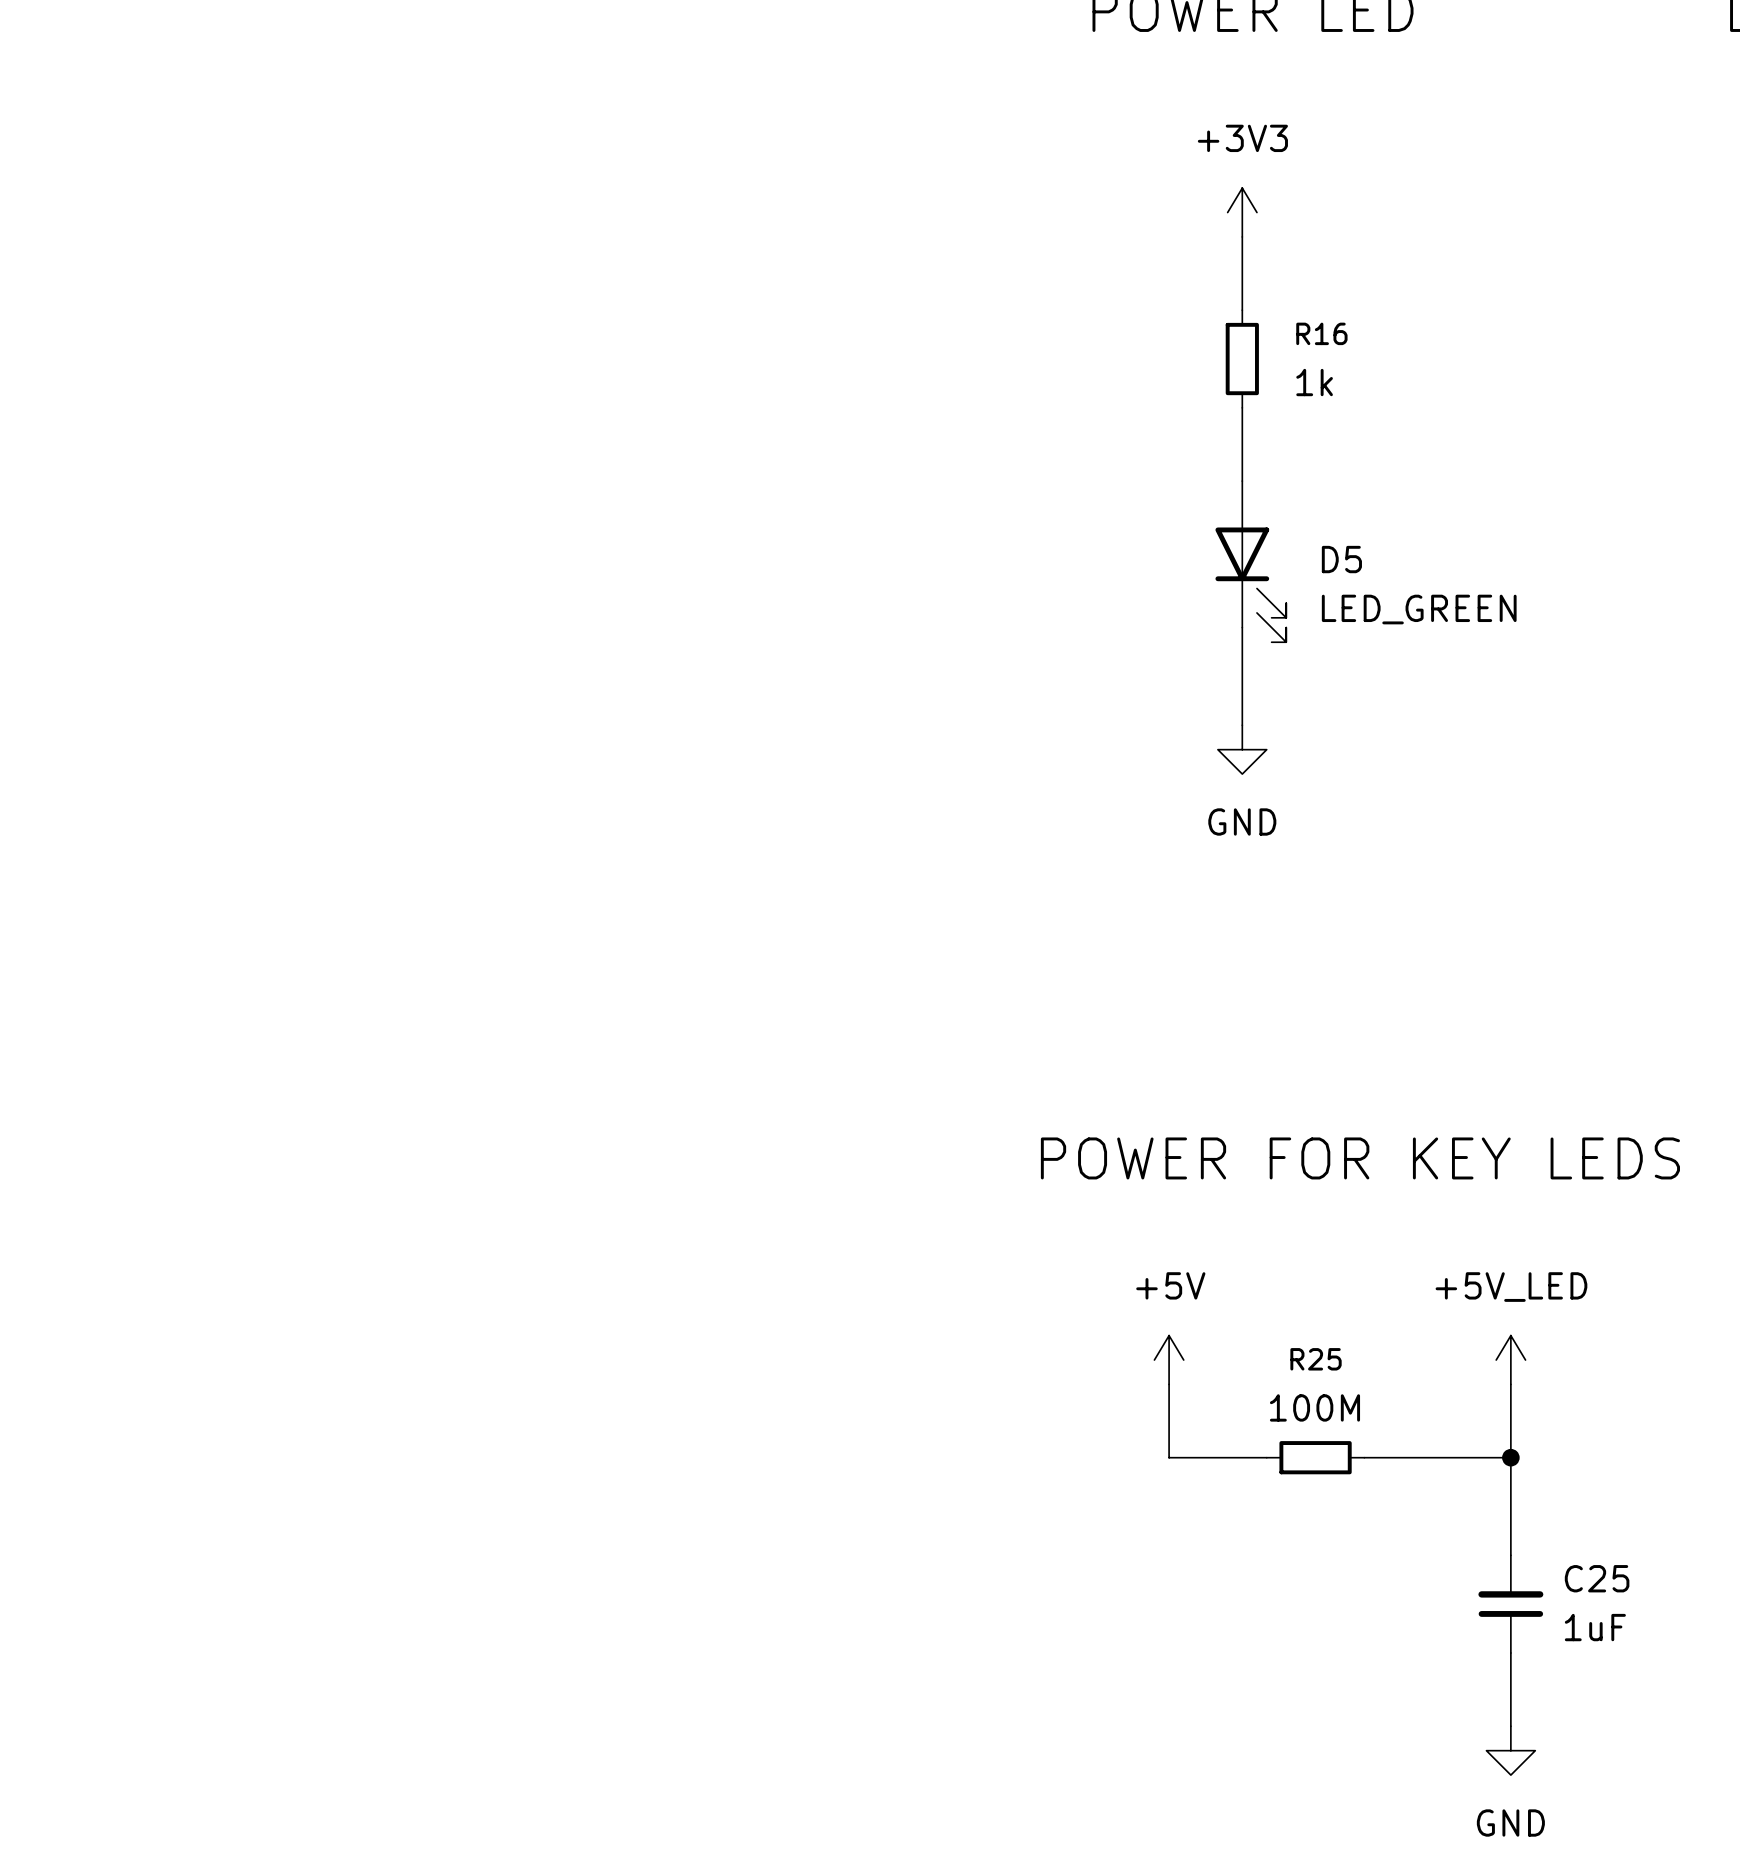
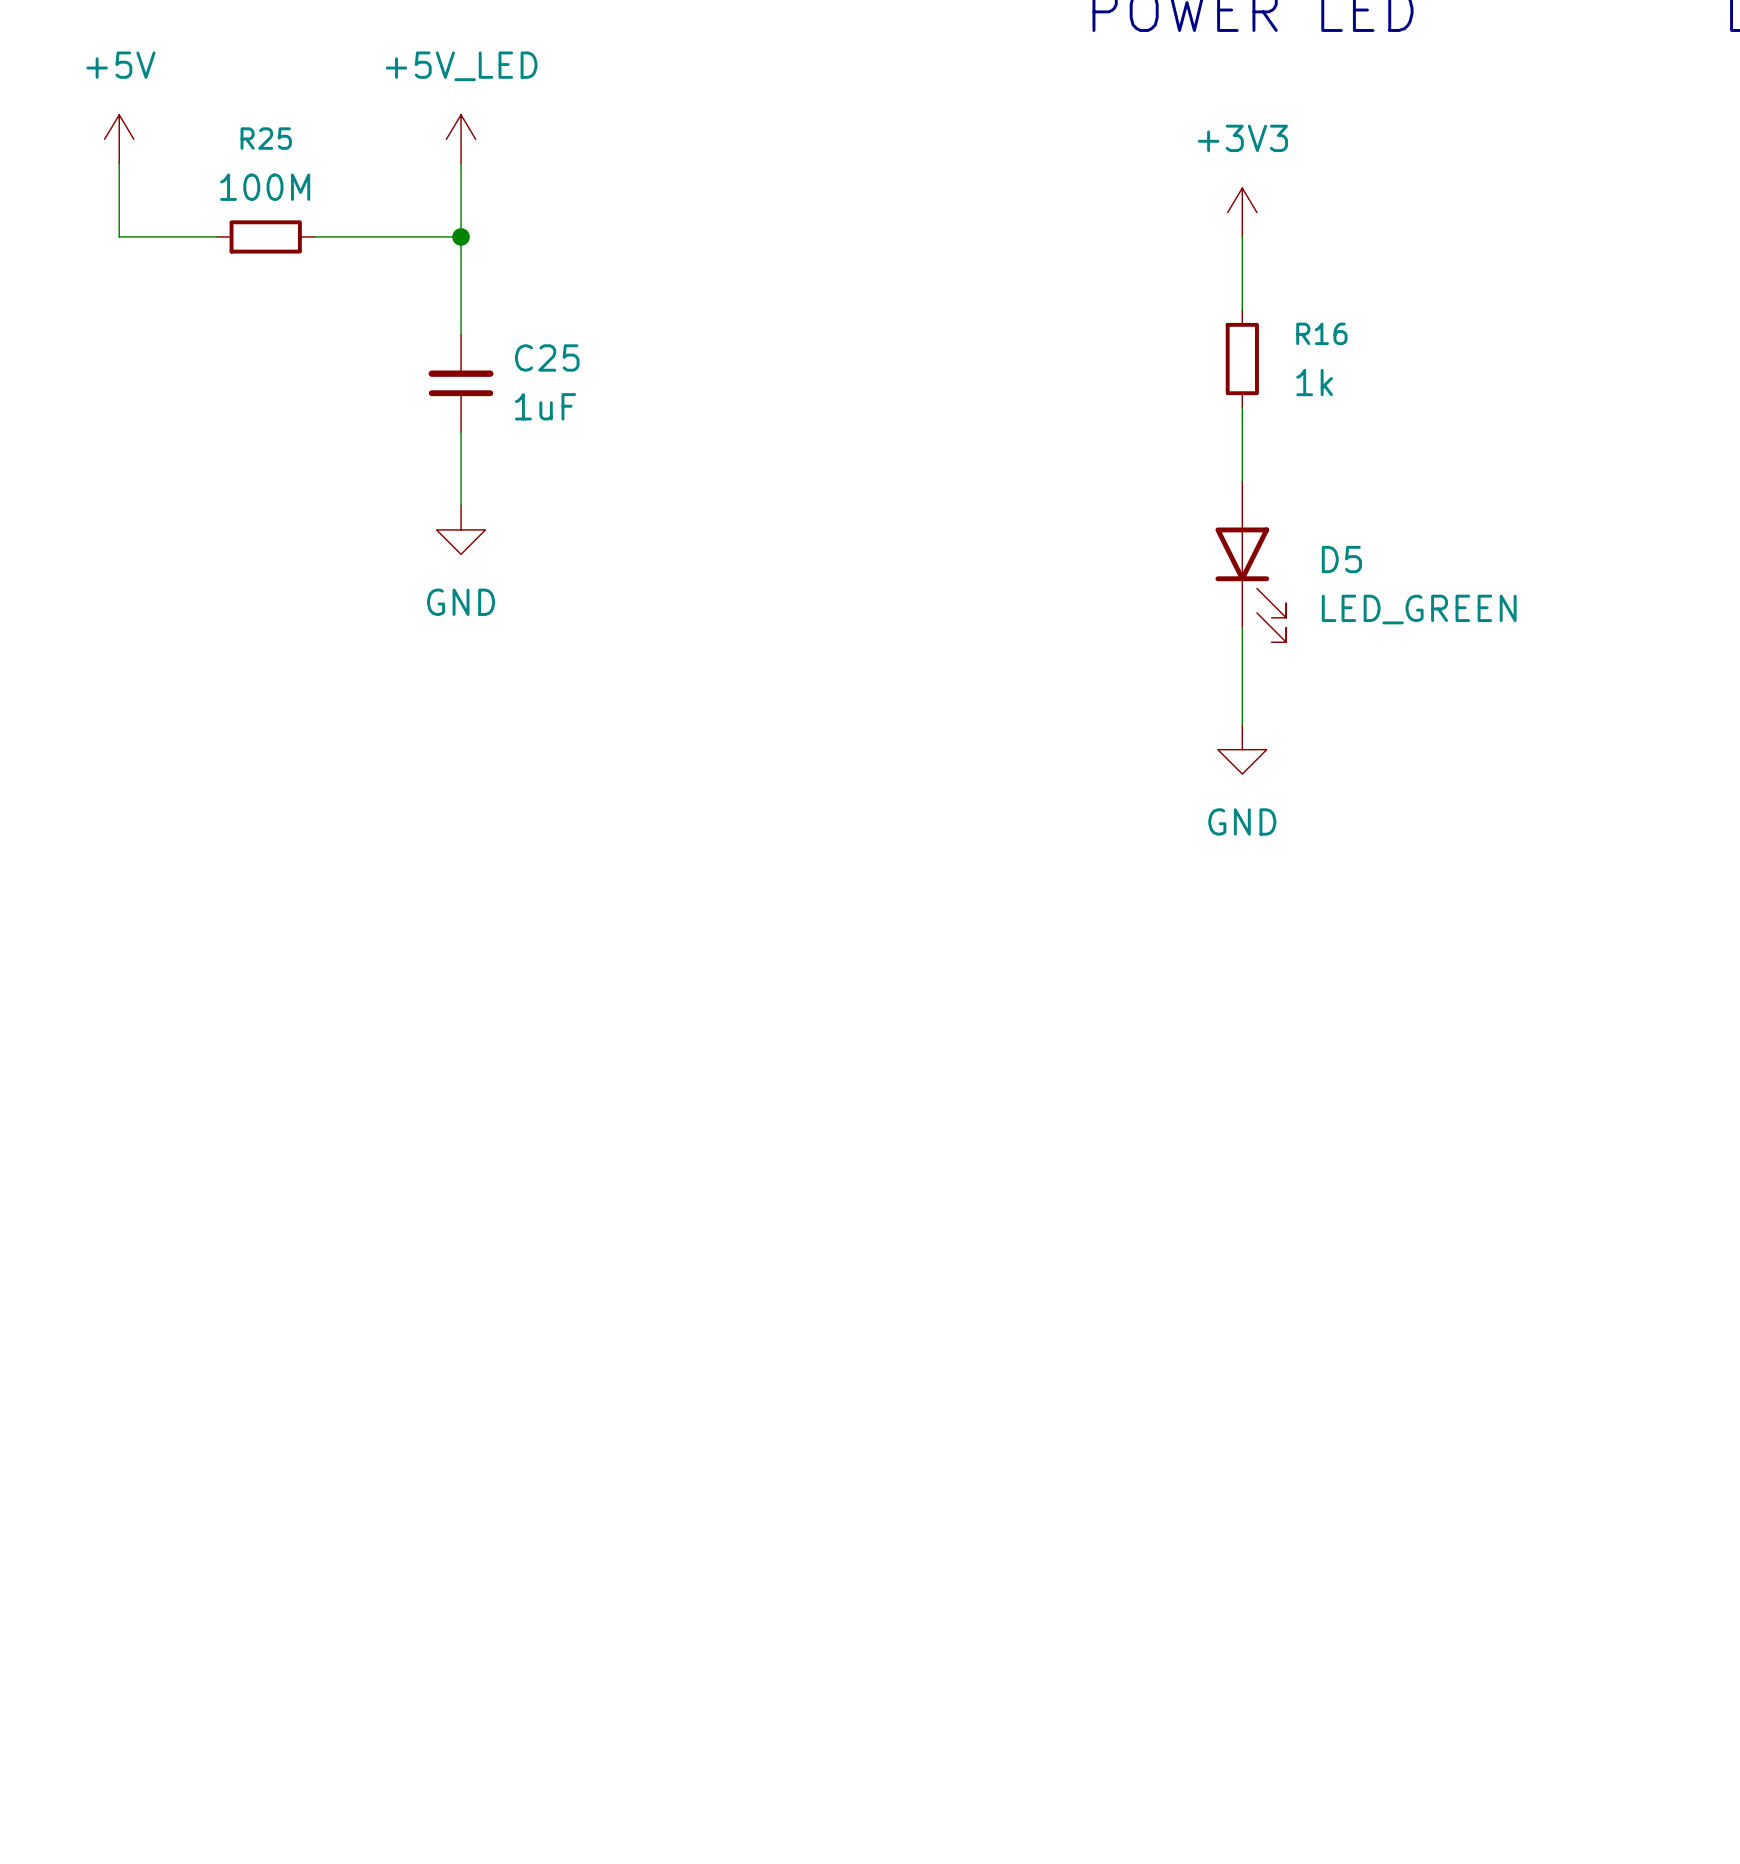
power symbol: none -> +5V (119, 139)
power symbol: none -> +5V_LED (461, 139)
wire: none -> (119, 163) (119, 236) (216, 236)
wire: none -> (461, 163) (461, 334)
wire: none -> (314, 236) (461, 236)
junction: none -> (461, 236)
wire: none -> (461, 432) (461, 505)
power symbol: none -> GND (461, 529)
text: POWER FOR KEY LEDS (1360, 1158) -> none
power symbol: +5V (1169, 1360) -> none
power symbol: +5V_LED (1510, 1360) -> none
wire: (1169, 1384) (1169, 1457) (1266, 1457) -> none
wire: (1510, 1384) (1510, 1555) -> none
R25 position: (1315, 1457) -> (265, 236)
wire: (1364, 1457) (1510, 1457) -> none
junction: (1510, 1457) -> none
C25 position: (1510, 1604) -> (461, 383)
wire: (1510, 1653) (1510, 1726) -> none
power symbol: GND (1510, 1750) -> none

